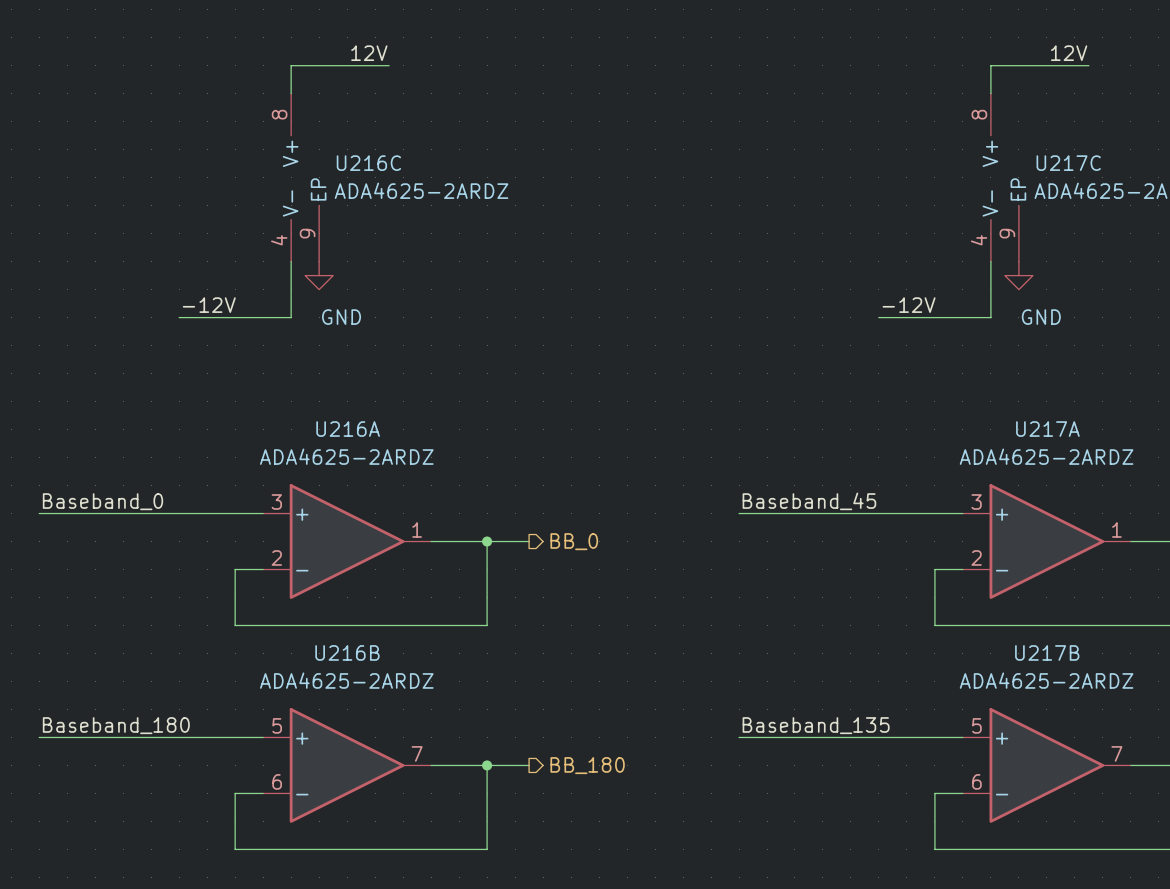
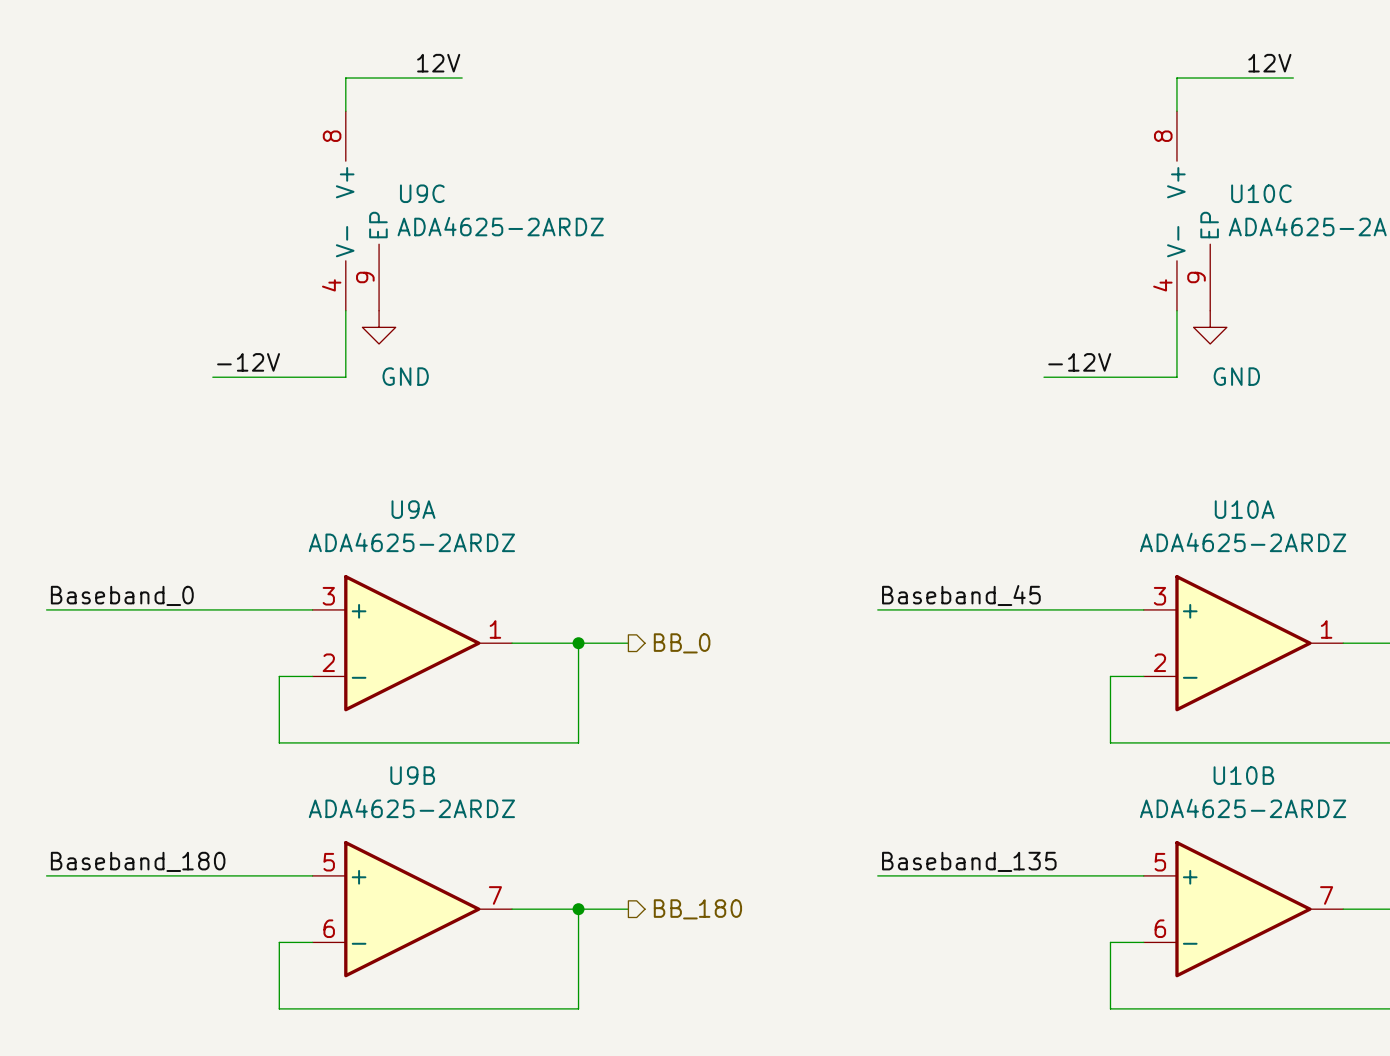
U216C name: U216C (368, 163) -> U9C (422, 193)
U217C name: U217C (1068, 163) -> U10C (1261, 193)
U216A name: U216A (348, 429) -> U9A (413, 509)
U217A name: U217A (1047, 429) -> U10A (1244, 509)
U216B name: U216B (347, 652) -> U9B (412, 775)
U217B name: U217B (1047, 652) -> U10B (1243, 775)

